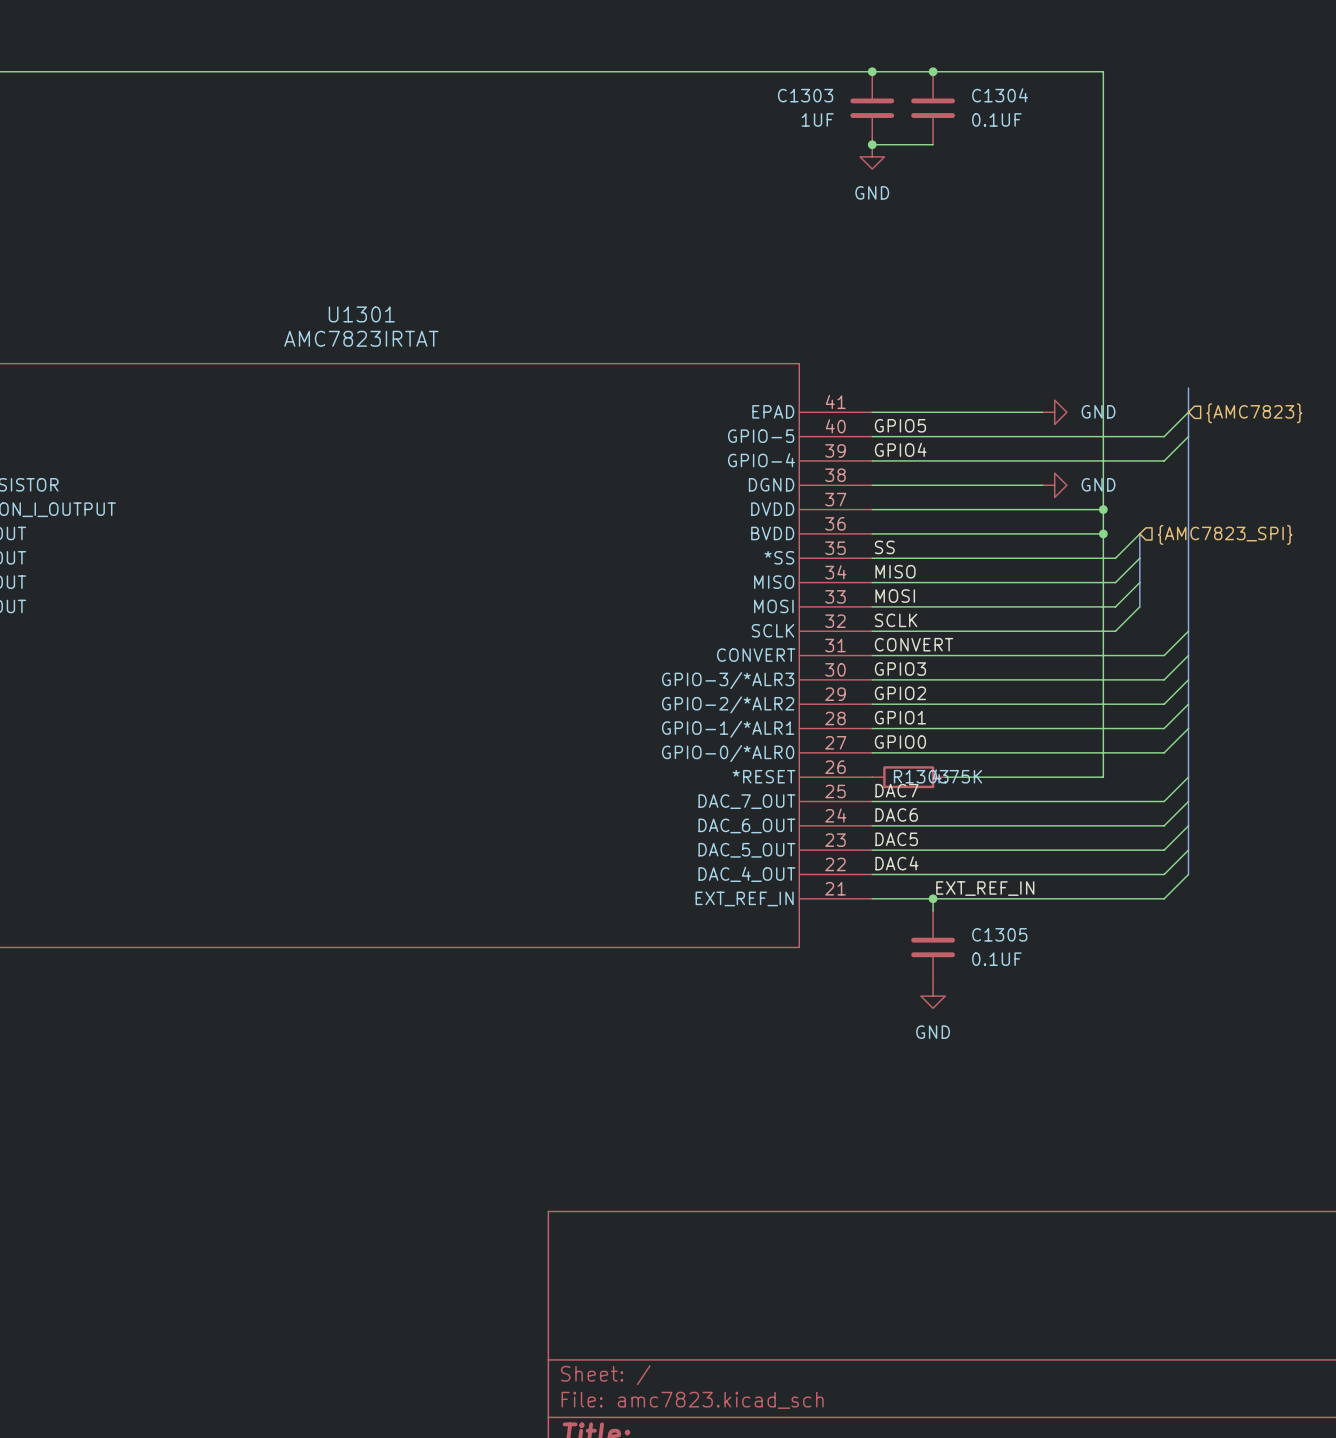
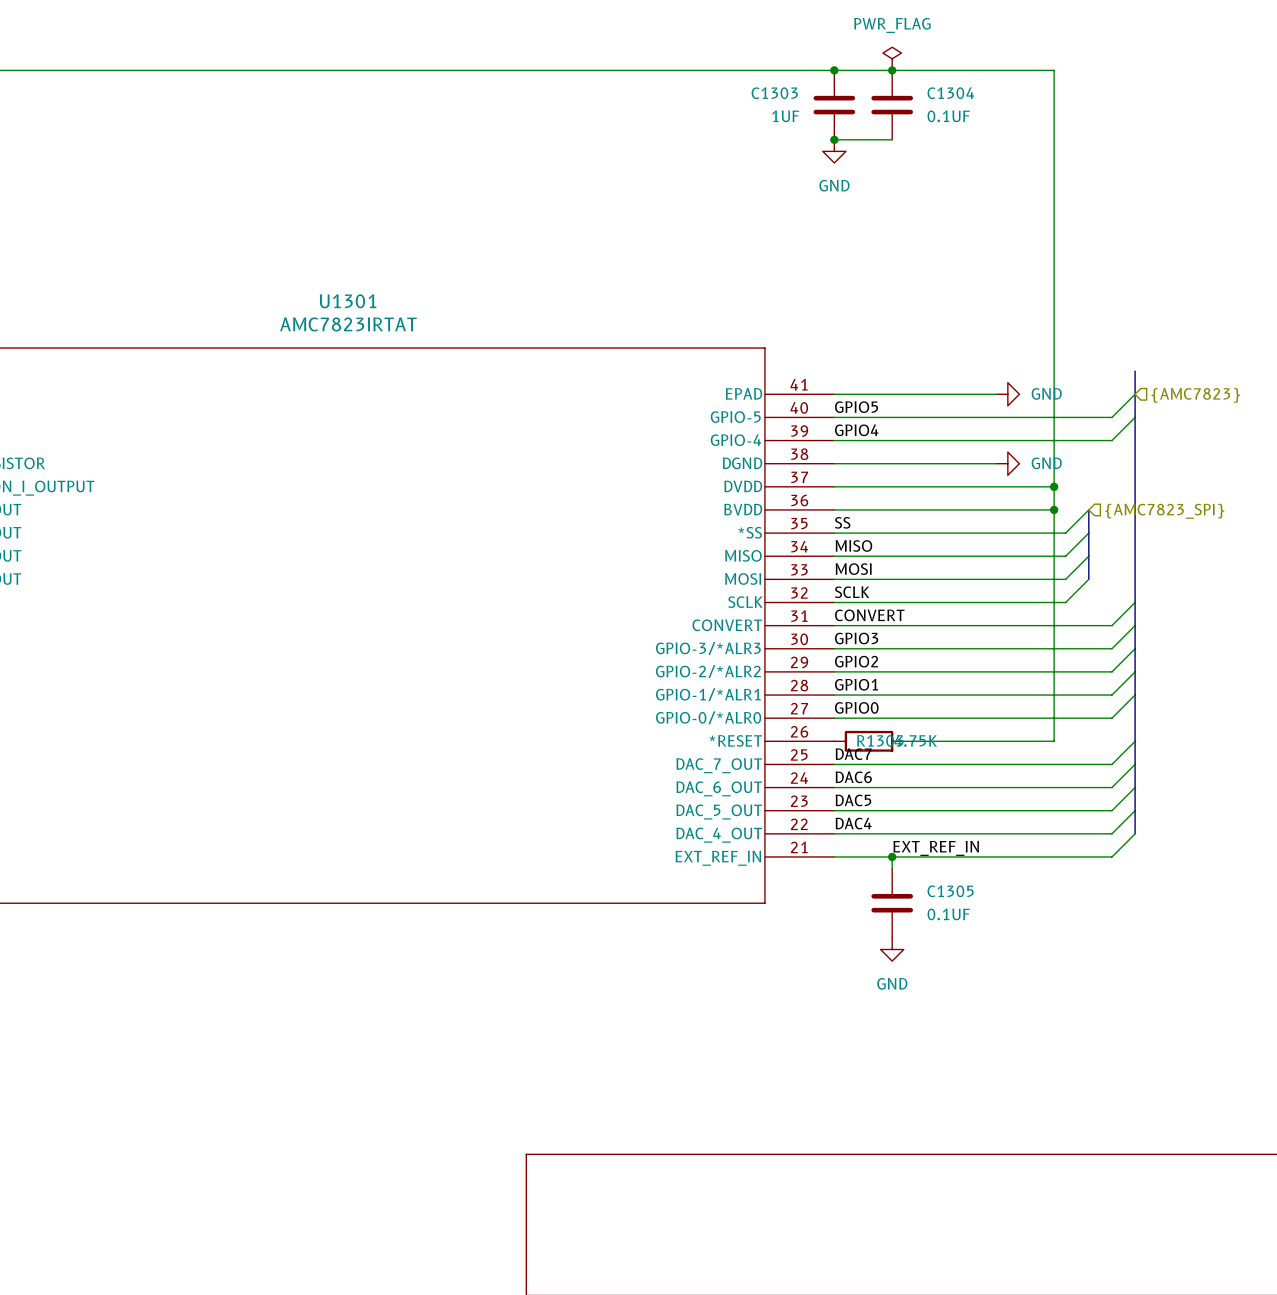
power symbol: none -> PWR_FLAG (892, 58)

